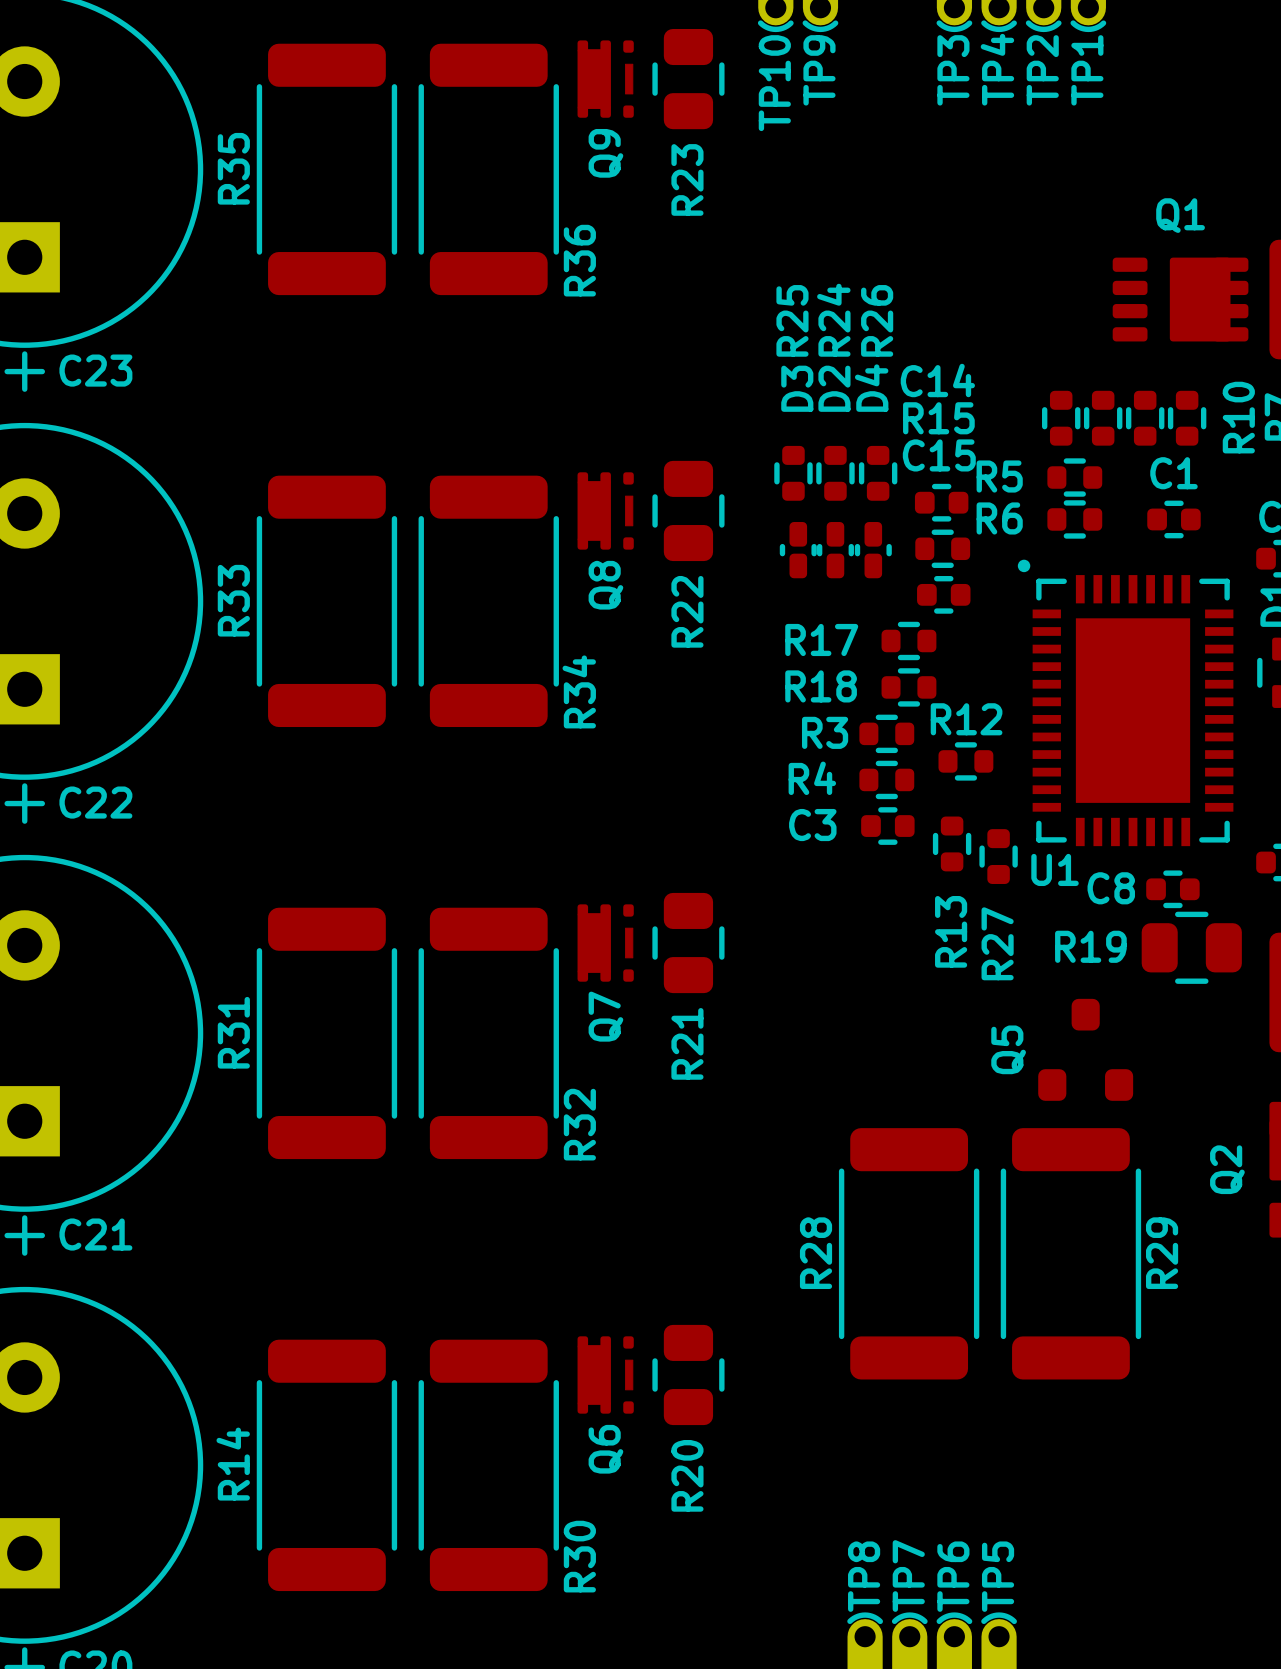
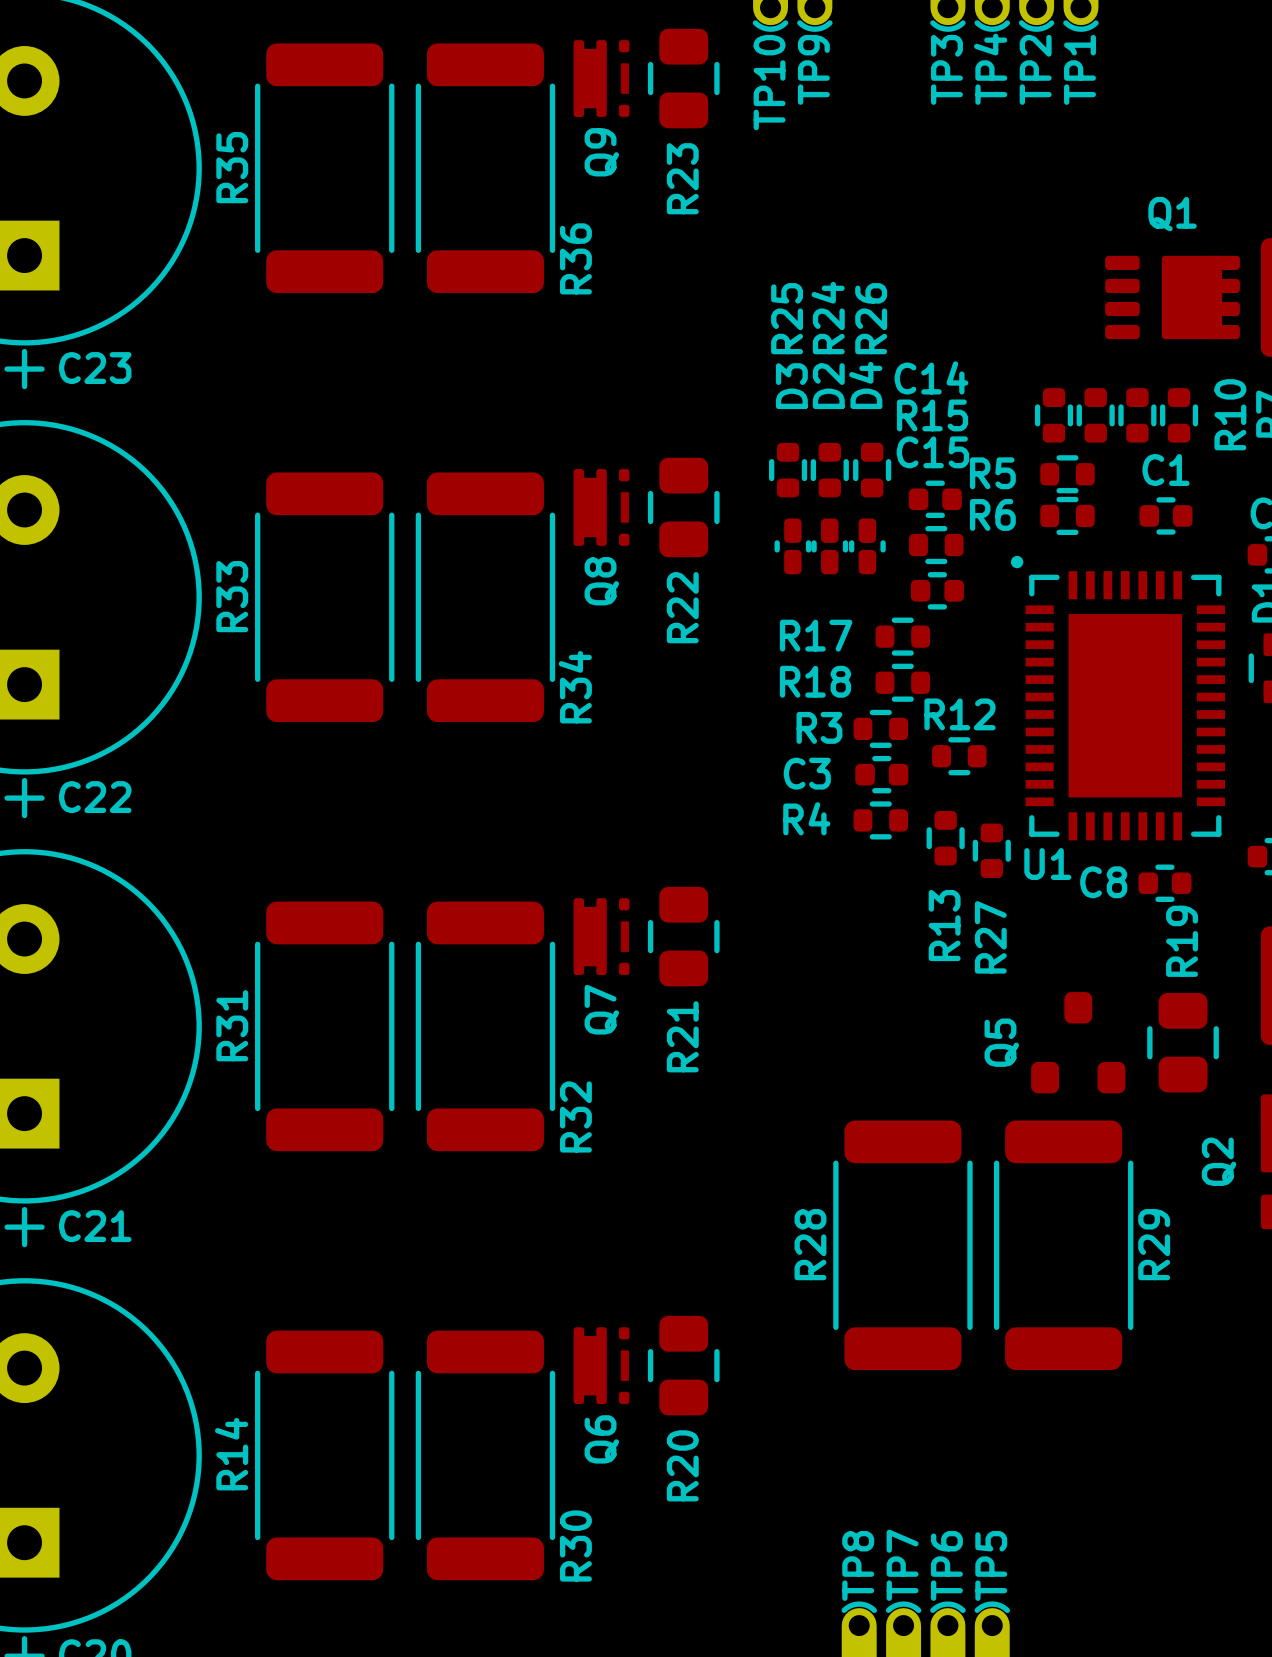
R4 position: (886, 779) -> (880, 820)
C3 position: (887, 826) -> (881, 774)
R19 rotation: 0° (1191, 947) -> 90° clockwise (1183, 1042)
R19 position: (1191, 947) -> (1183, 1042)

